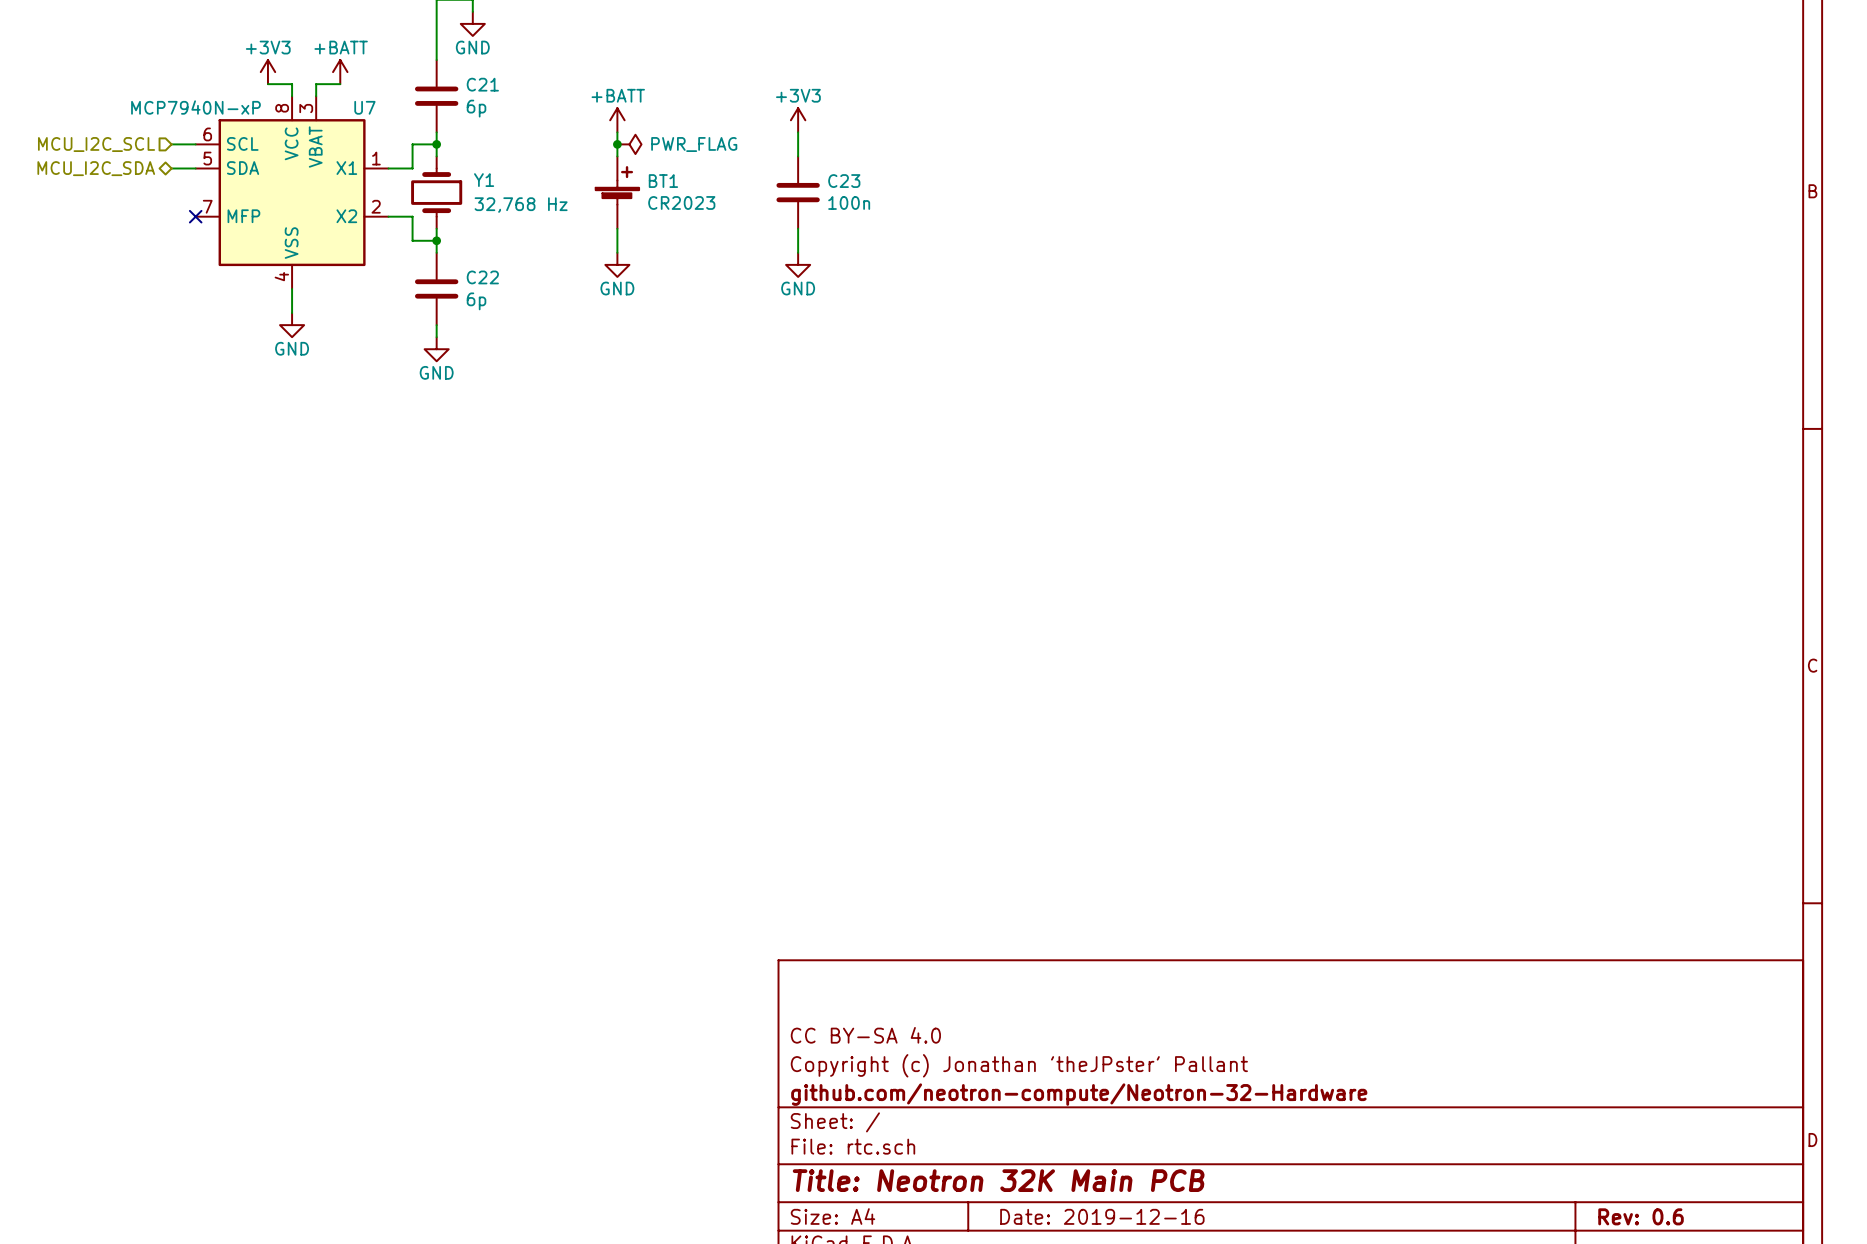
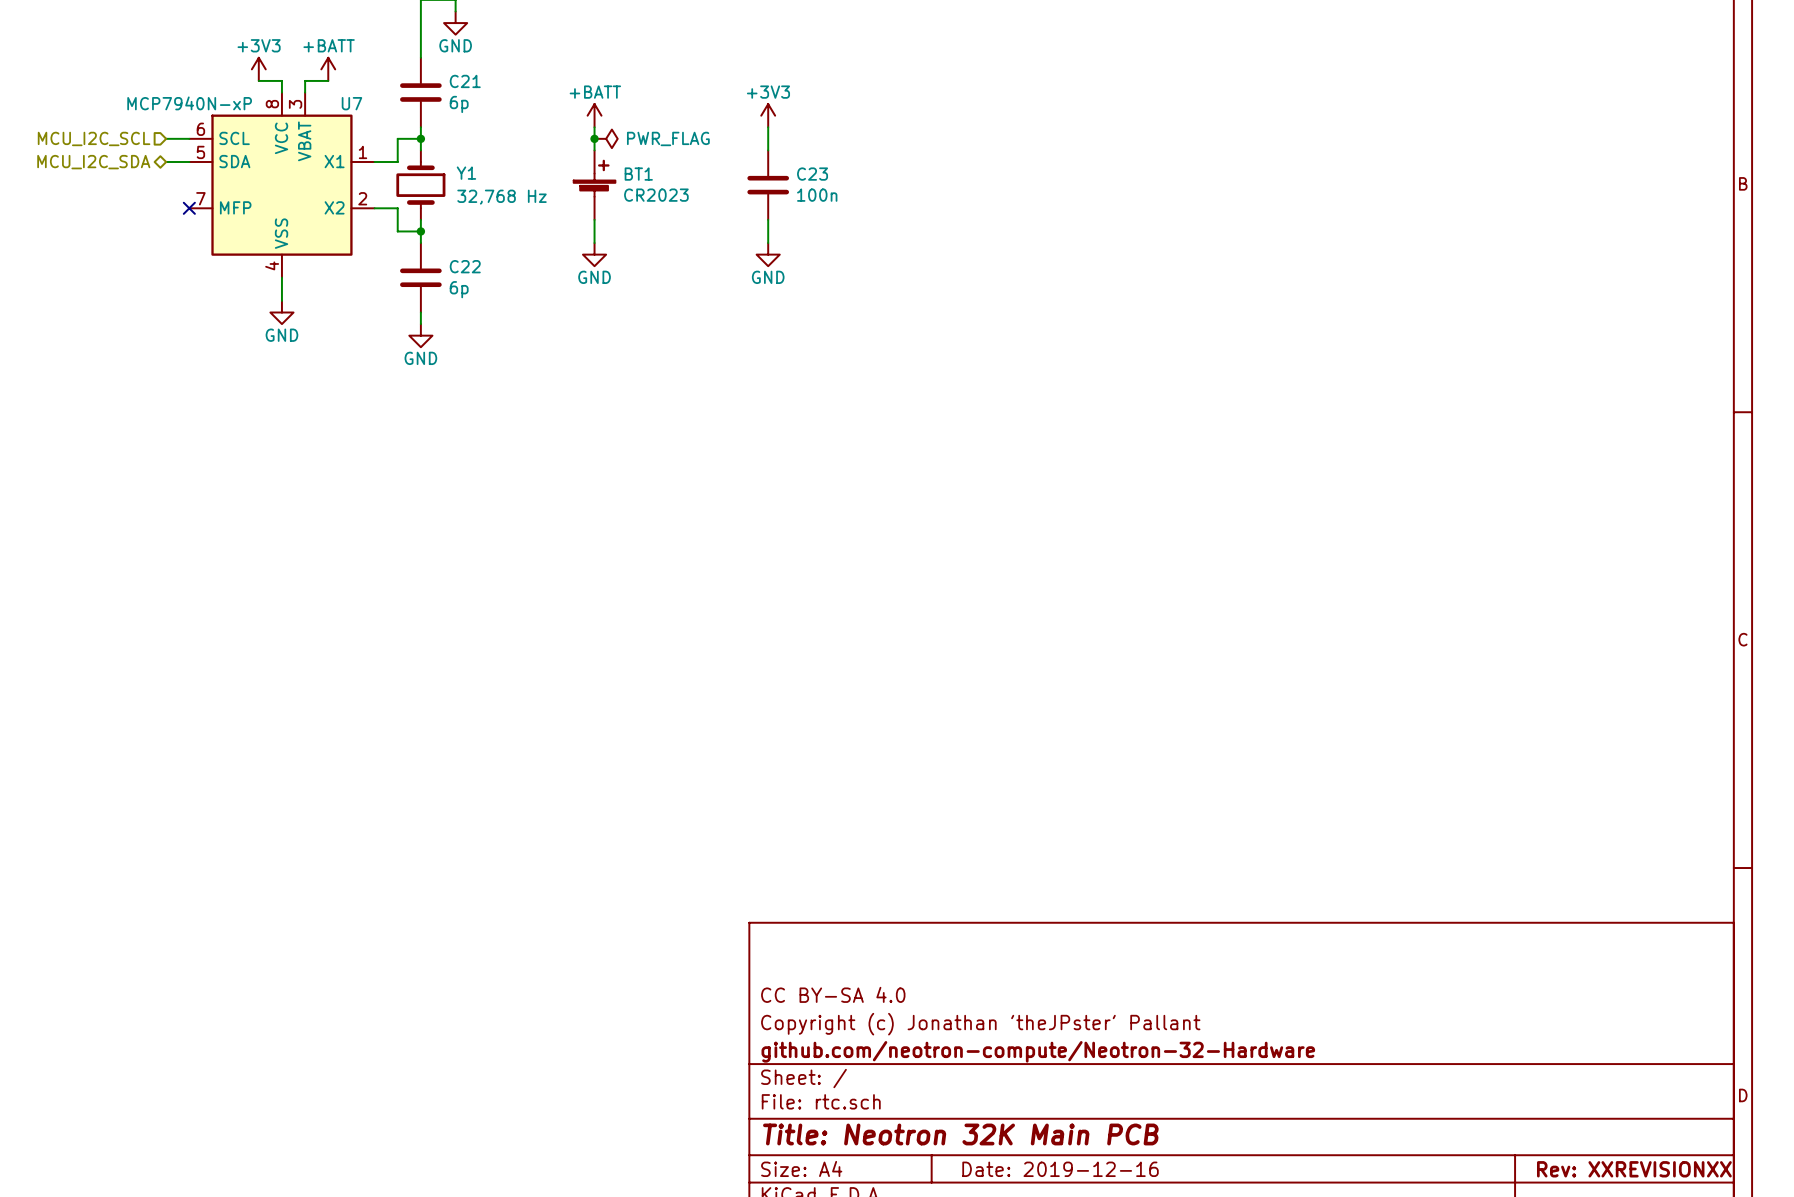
title block: Rev: 0.6 (1641, 1216) -> Rev: XXREVISIONXX (1634, 1169)

